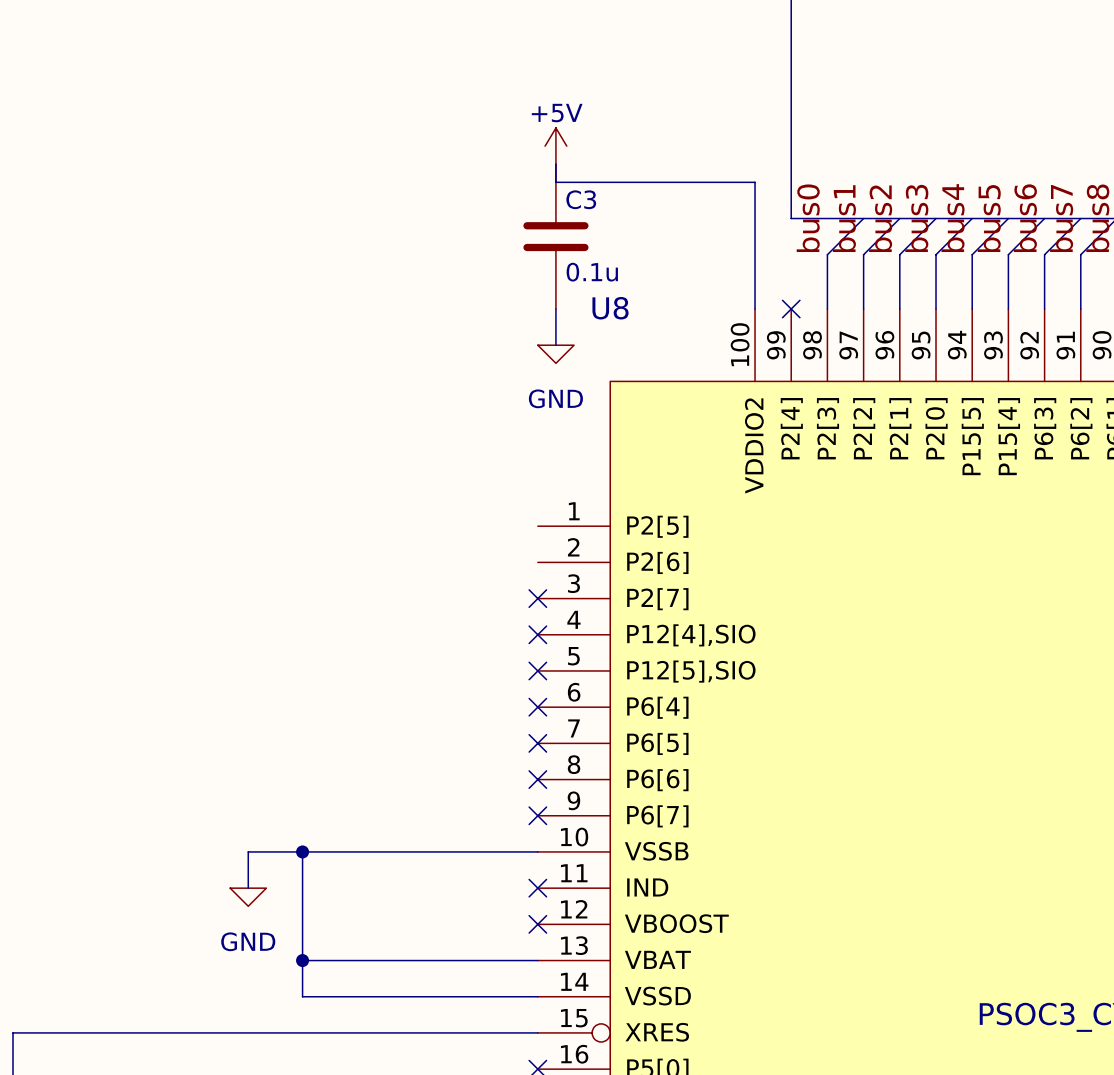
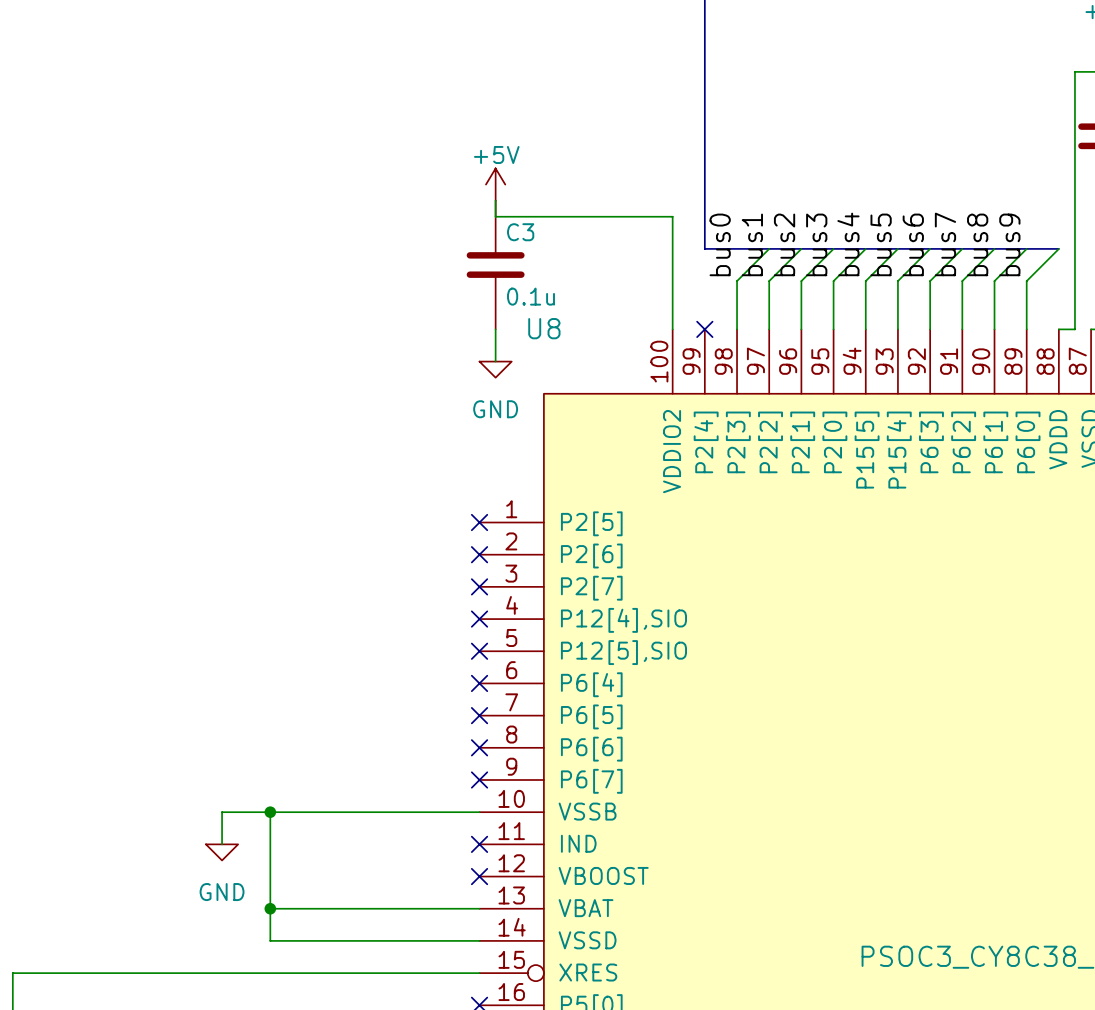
no-connect mark: none -> (479, 522)
no-connect mark: none -> (479, 554)

